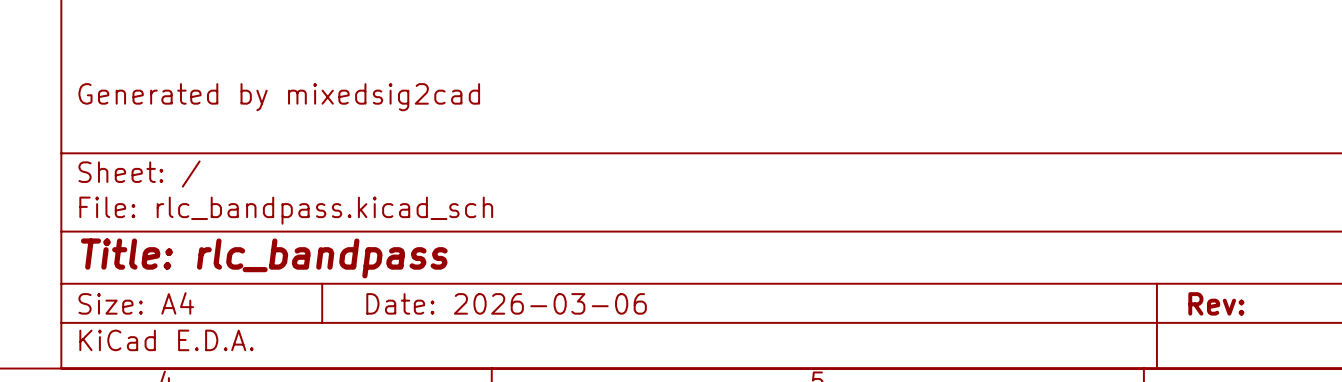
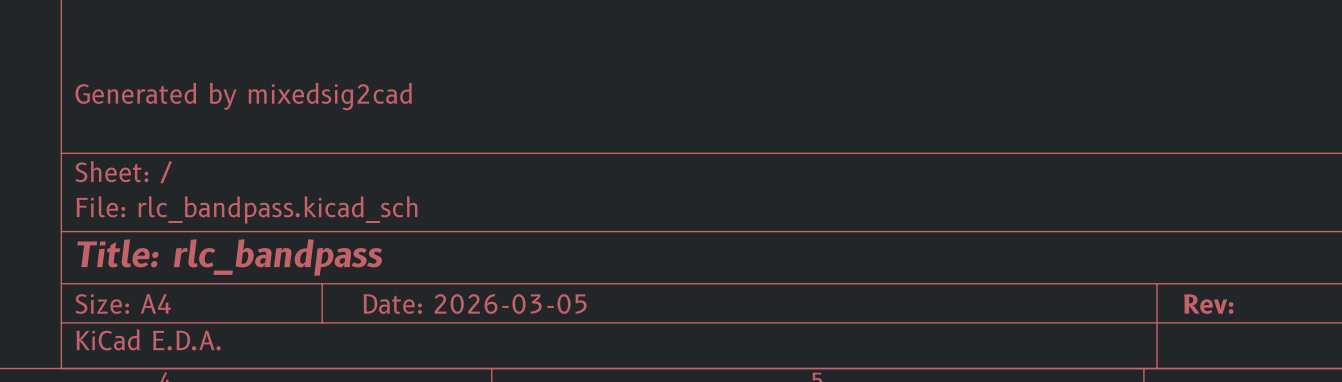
title block: Date: 2026-03-06 (506, 303) -> Date: 2026-03-05 (475, 304)

